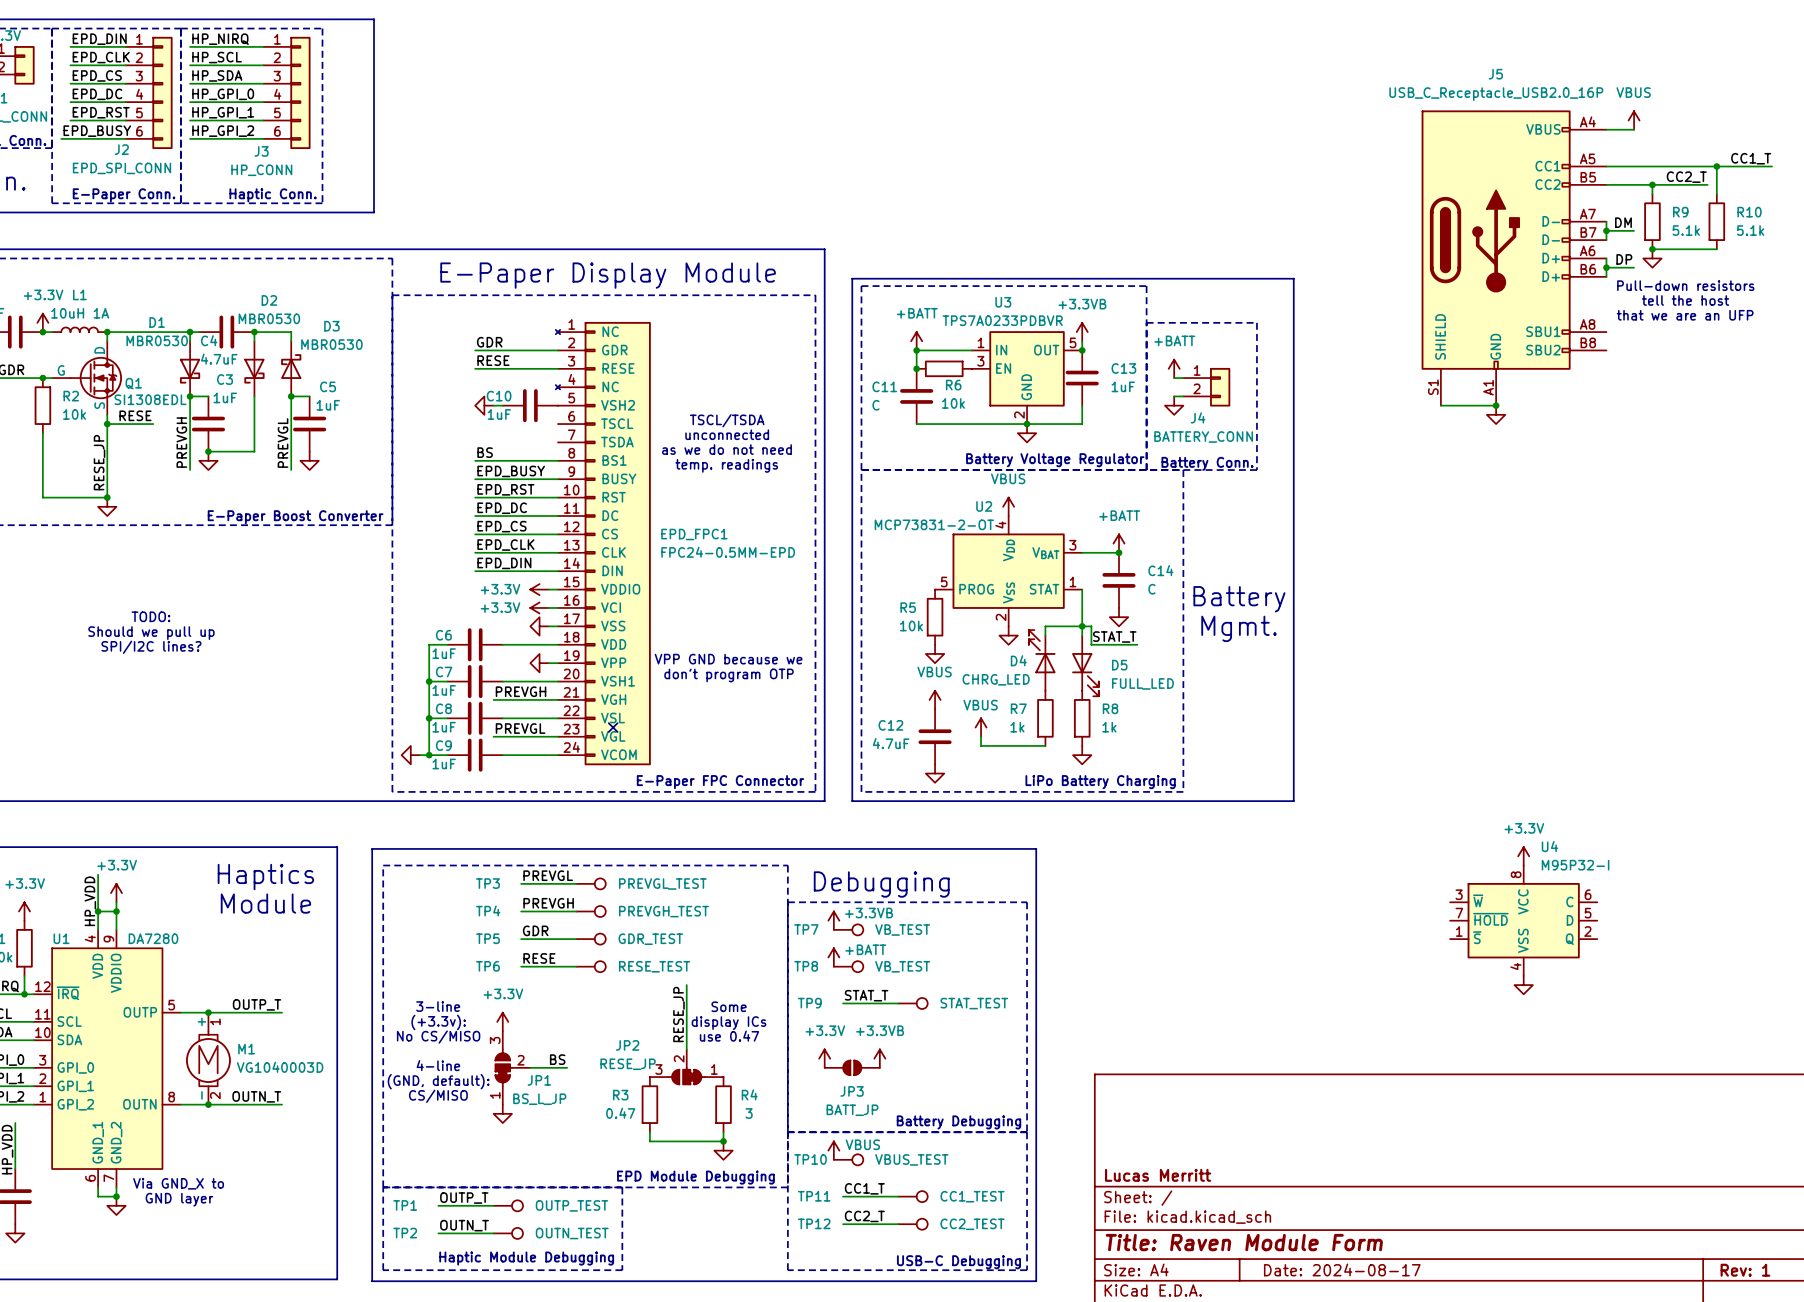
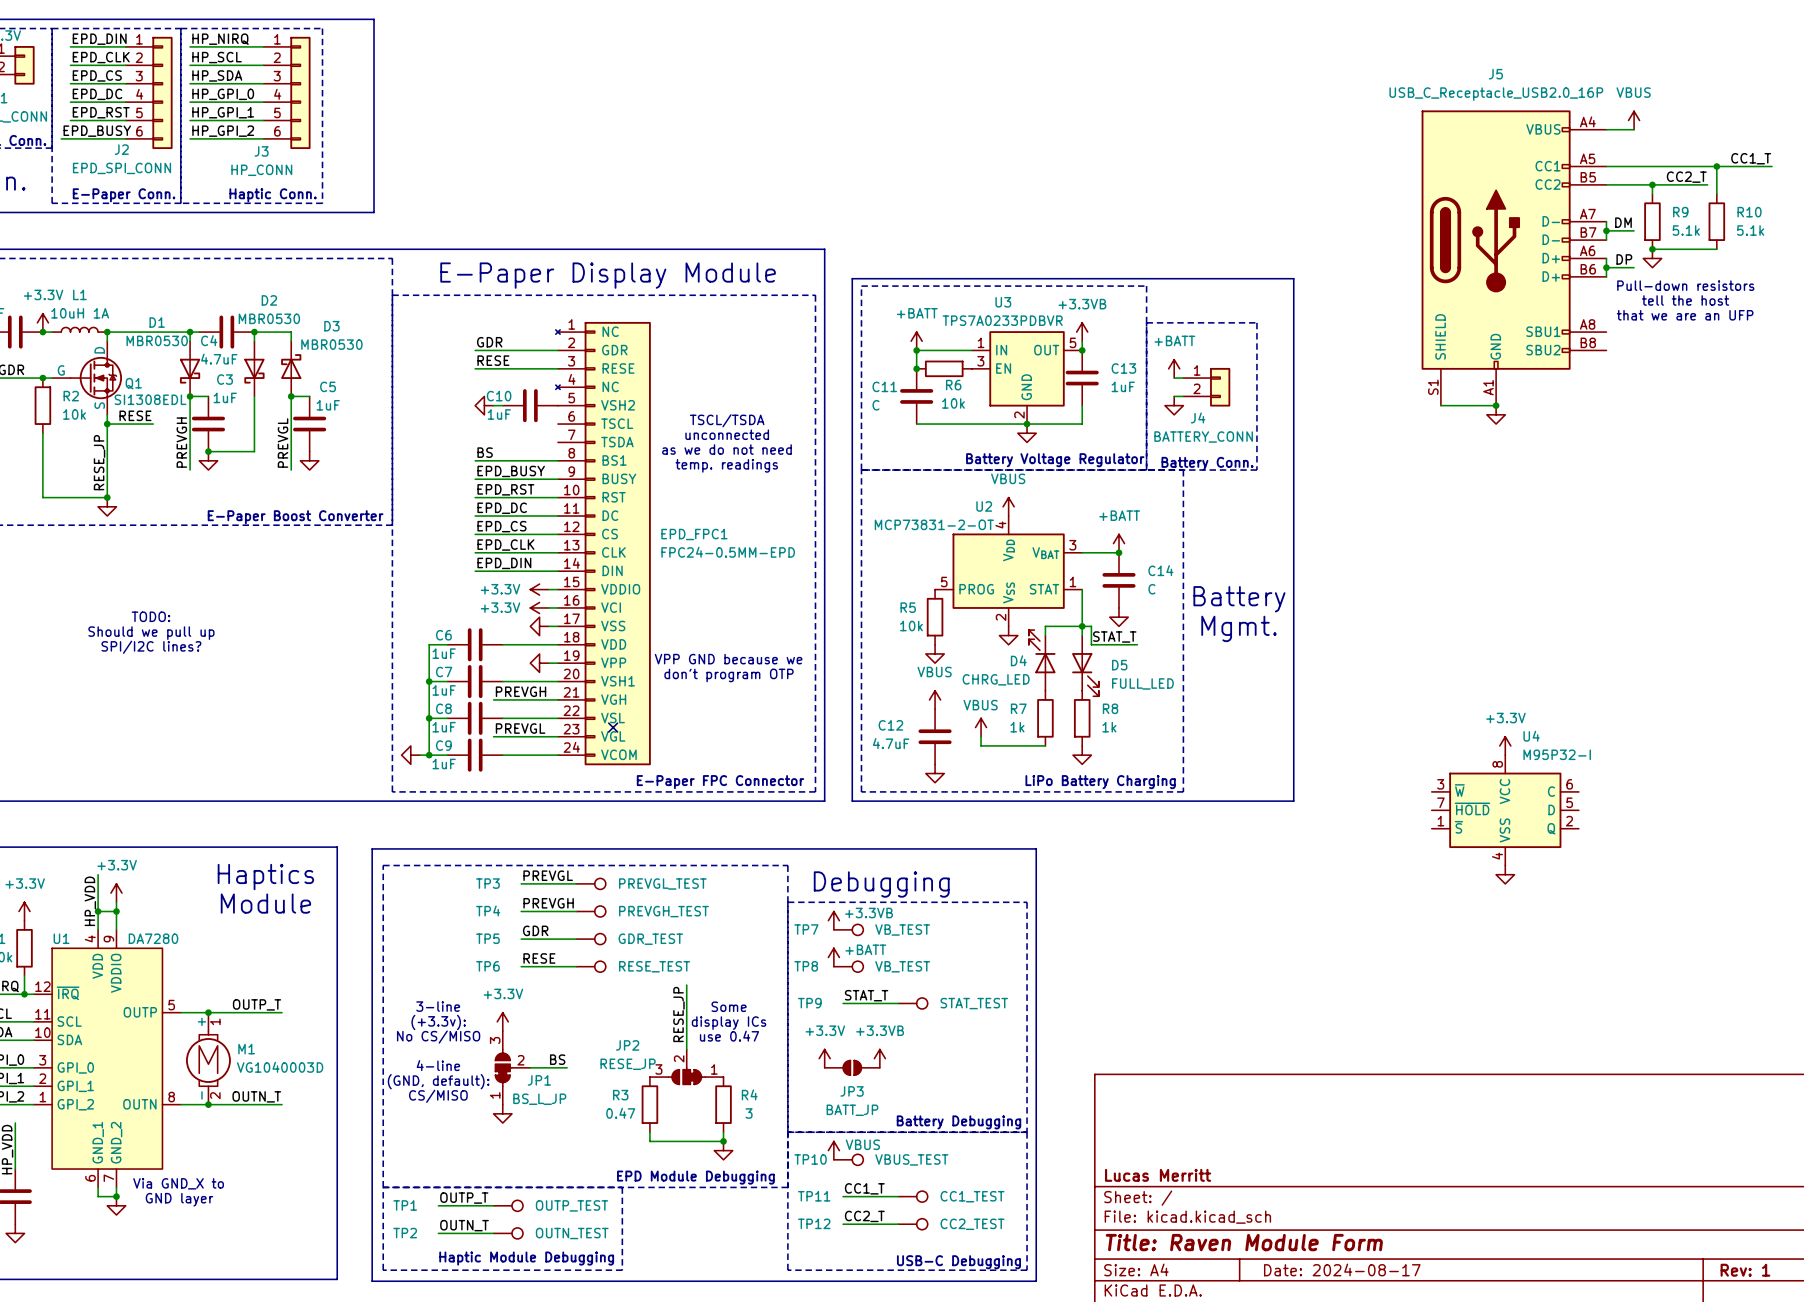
power symbol position: +3.3V (1523, 856) -> +3.3V (1505, 745)
U4 position: (1523, 920) -> (1505, 810)
power symbol position: (1523, 985) -> (1505, 874)

